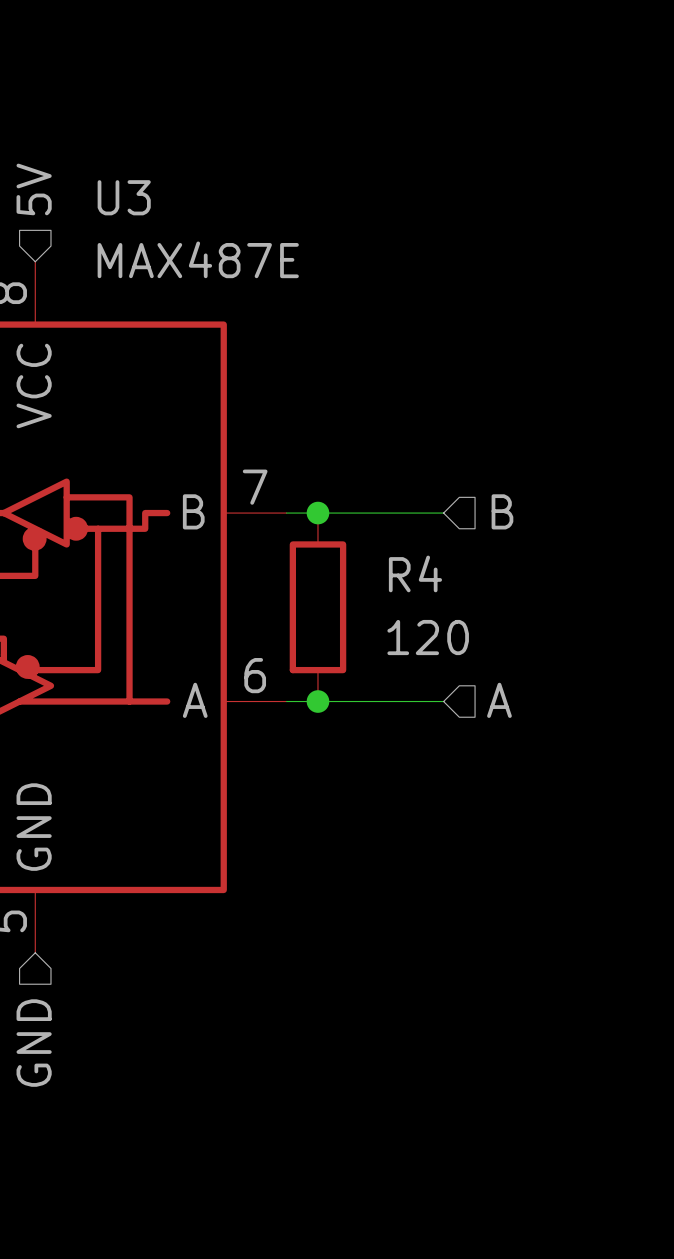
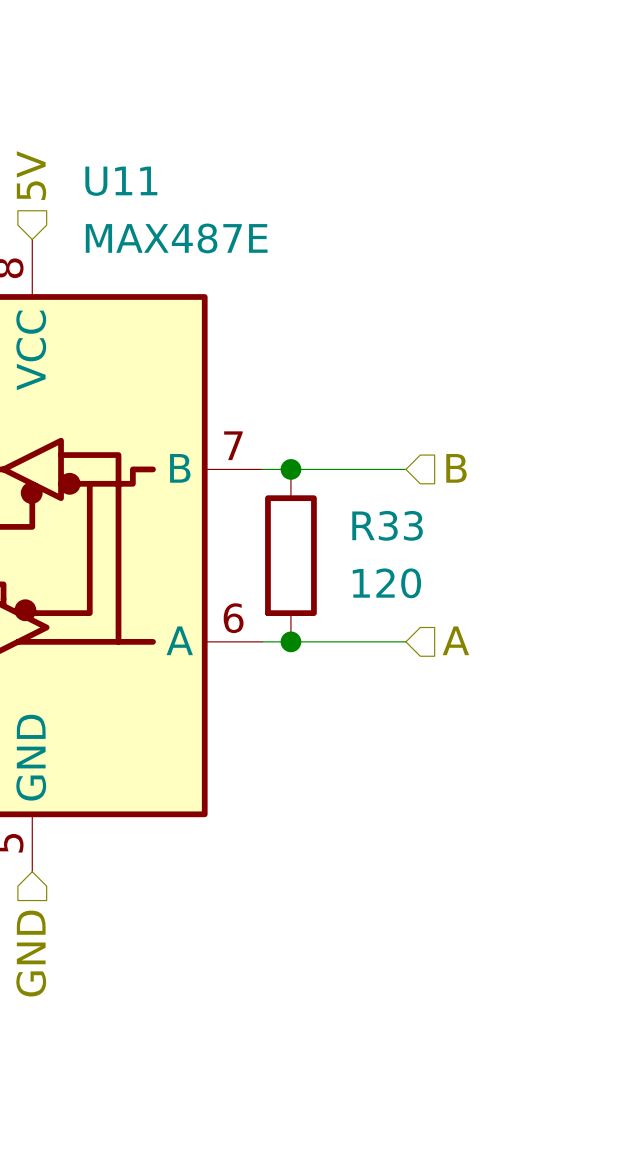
U3 name: U3 (124, 197) -> U11 (121, 181)
R4 name: R4 (415, 573) -> R33 (387, 525)

